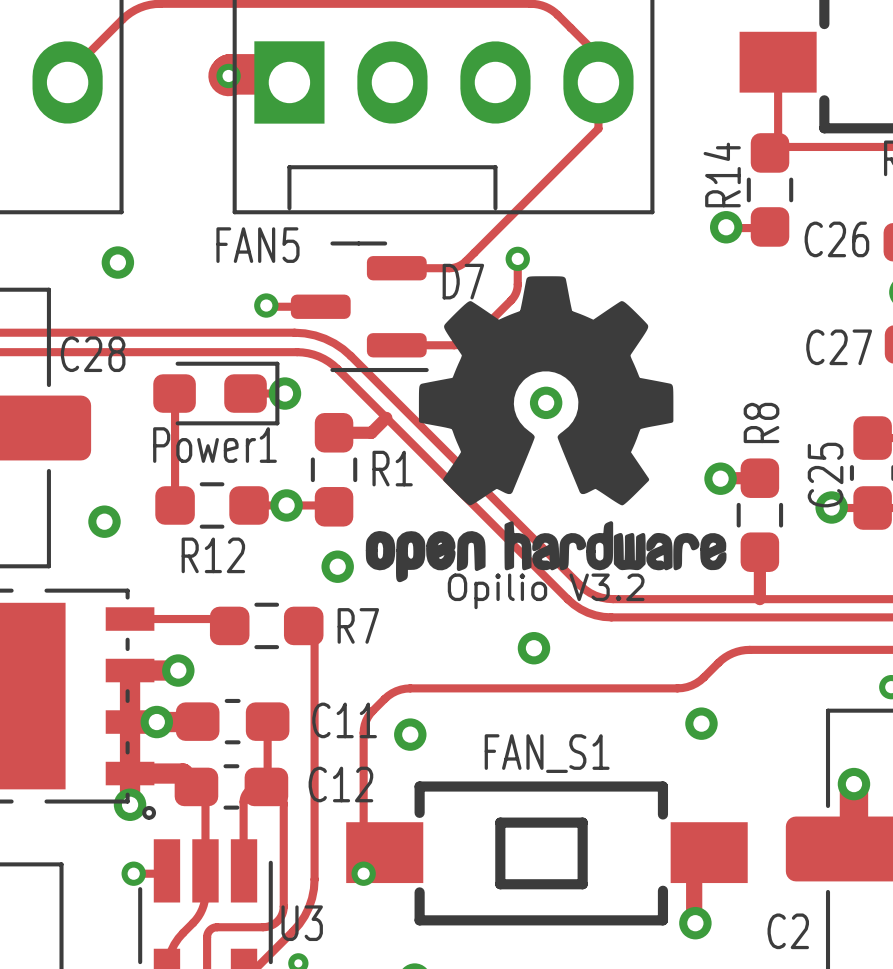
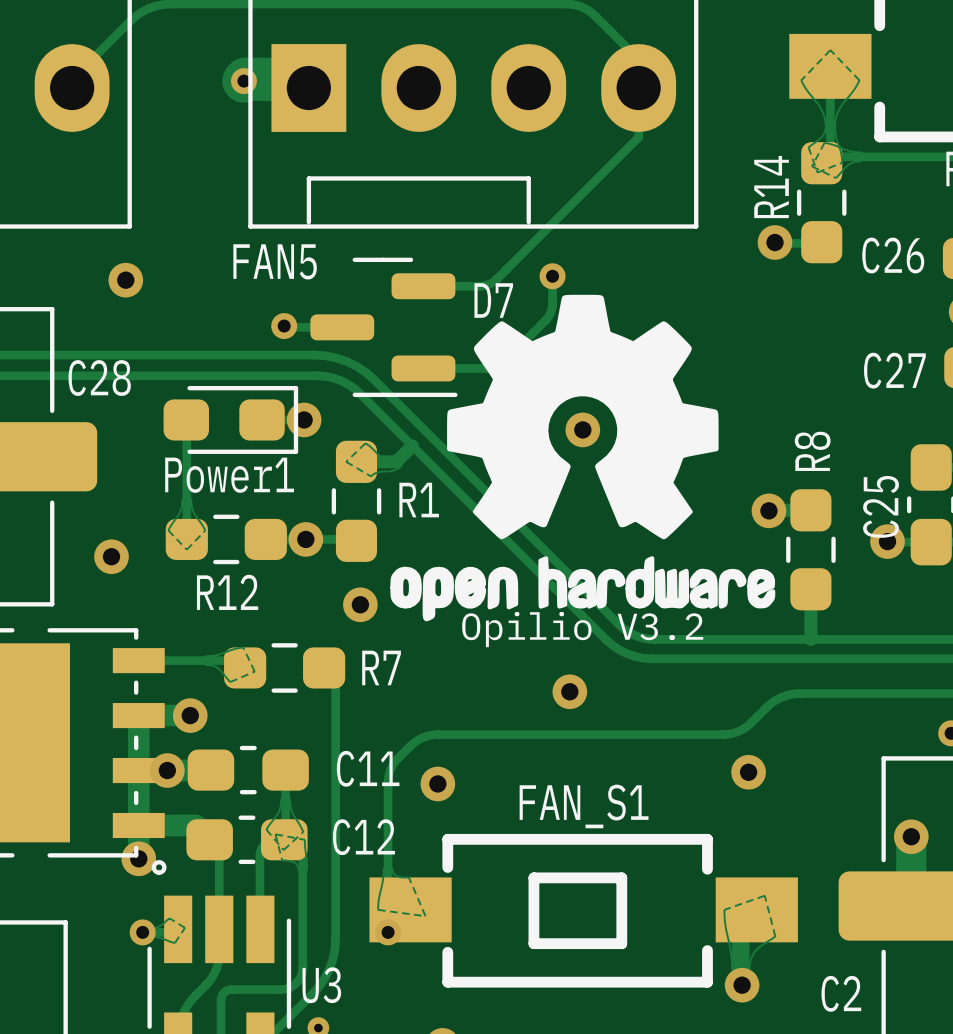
zone outline: none -> (830, 50) (859, 80) (838, 111) (834, 130) (826, 130) (822, 111) (801, 80) (830, 50)
zone outline: none -> (839, 147) (842, 162) (817, 172) (808, 147) (822, 135) (826, 123) (834, 123) (839, 147)
zone outline: none -> (839, 147) (862, 152) (862, 161) (848, 164) (835, 178) (811, 166) (824, 142) (839, 147)
zone outline: none -> (365, 443) (381, 457) (386, 459) (392, 456) (401, 465) (395, 470) (376, 472) (371, 476) (346, 461) (365, 443)
zone outline: none -> (182, 498) (180, 510) (168, 530) (186, 549) (205, 530) (192, 510) (191, 498) (182, 498)
zone outline: none -> (243, 647) (254, 671) (230, 682) (217, 668) (205, 664) (205, 656) (243, 647)
zone outline: none -> (281, 798) (278, 813) (266, 829) (283, 850) (303, 831) (291, 810) (289, 798) (281, 798)
zone outline: none -> (275, 834) (304, 839) (307, 870) (298, 870) (295, 863) (282, 860) (275, 834)
zone outline: none -> (383, 867) (378, 909) (425, 916) (408, 877) (397, 876) (393, 872) (392, 867) (383, 867)
zone outline: none -> (764, 895) (775, 936) (754, 952) (750, 960) (749, 970) (732, 970) (724, 909) (764, 895)
zone outline: none -> (169, 918) (185, 927) (174, 943) (150, 936) (150, 928) (159, 926) (169, 918)

